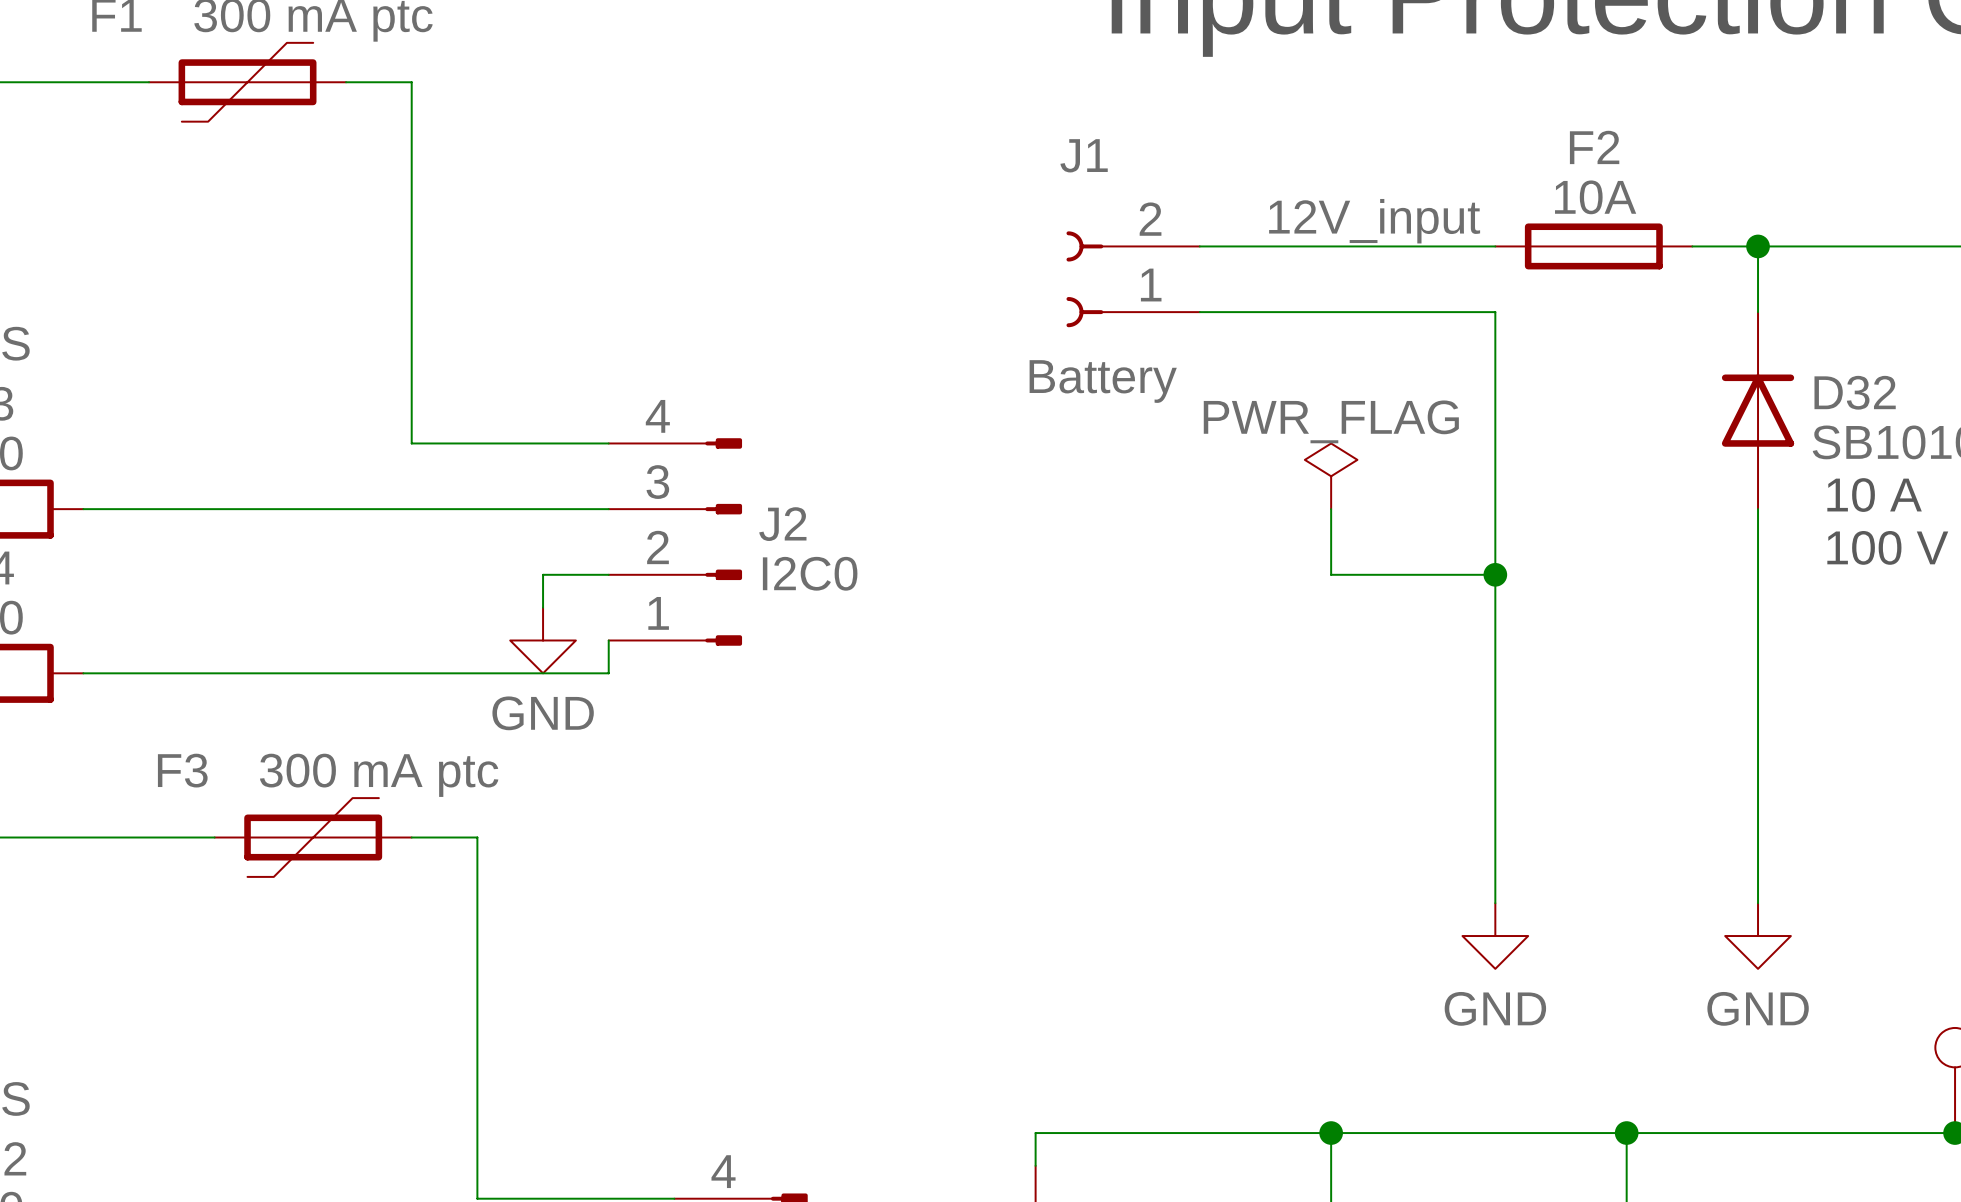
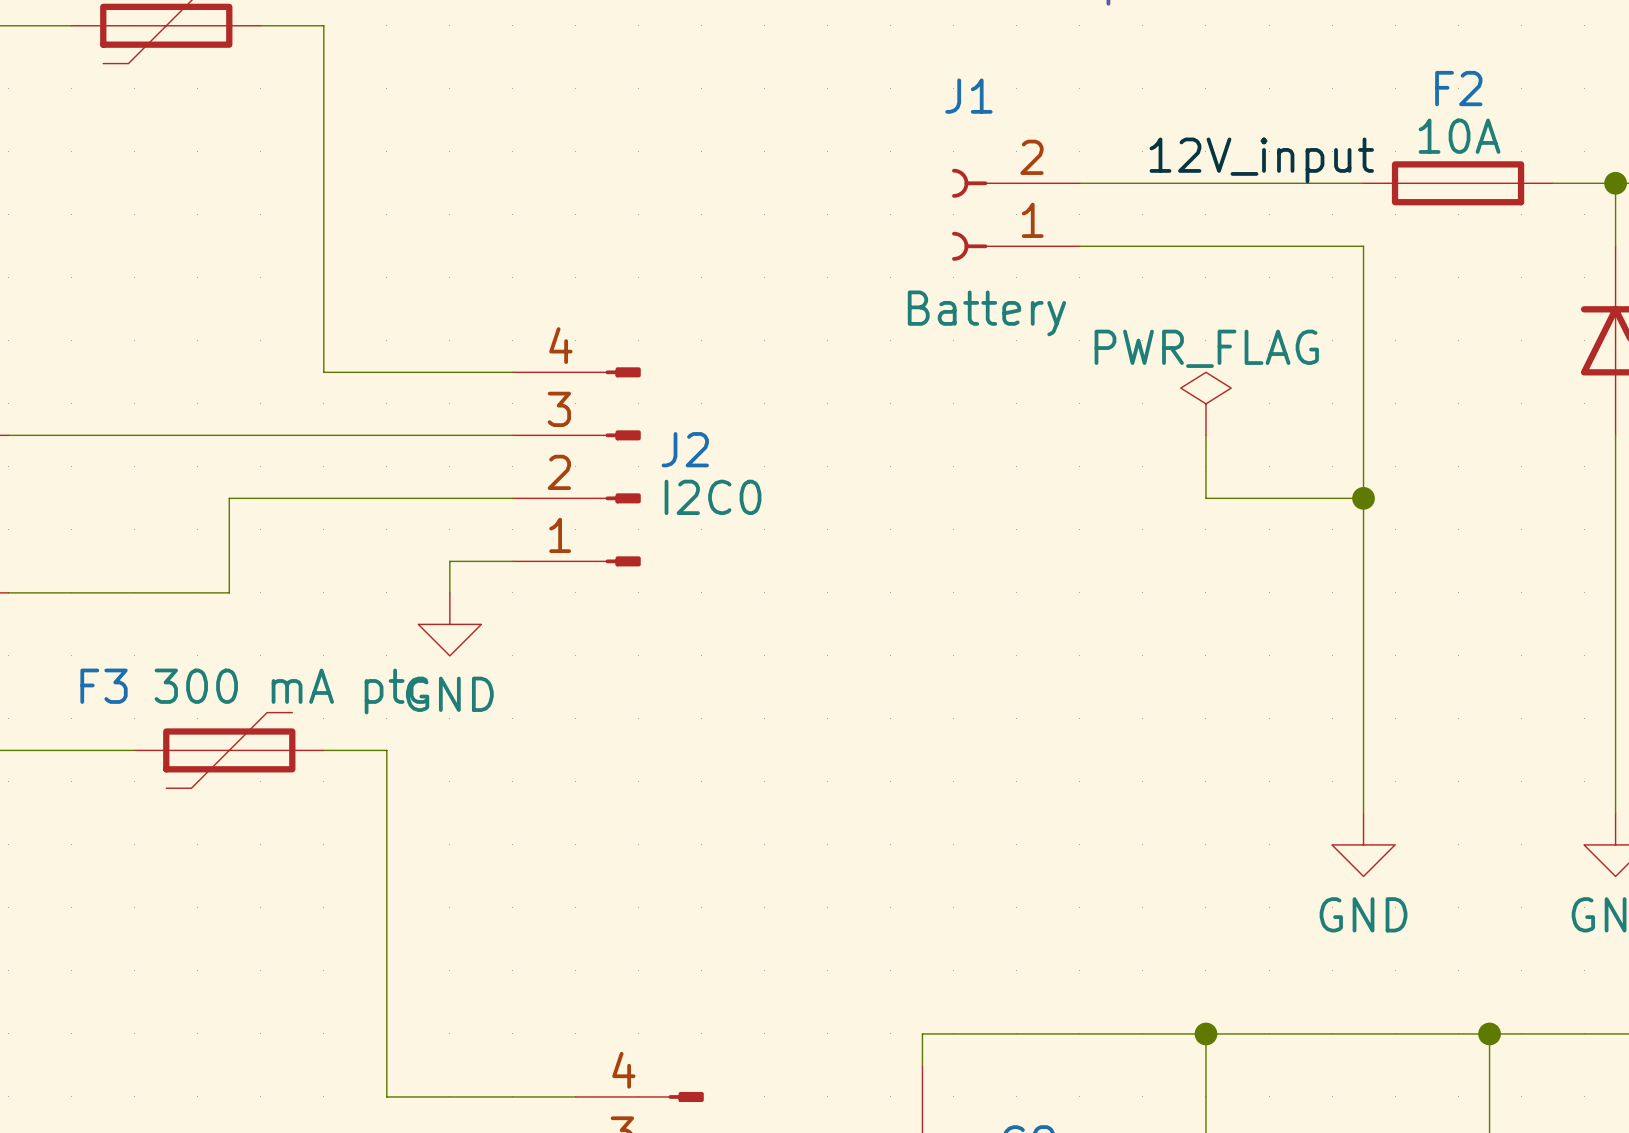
wire: (543, 574) (543, 607) -> none
power symbol position: GND (543, 640) -> GND (449, 624)
wire: (608, 640) (608, 673) (313, 673) -> (449, 498) (229, 498) (229, 592)
wire: none -> (512, 561) (449, 561) (449, 592)

